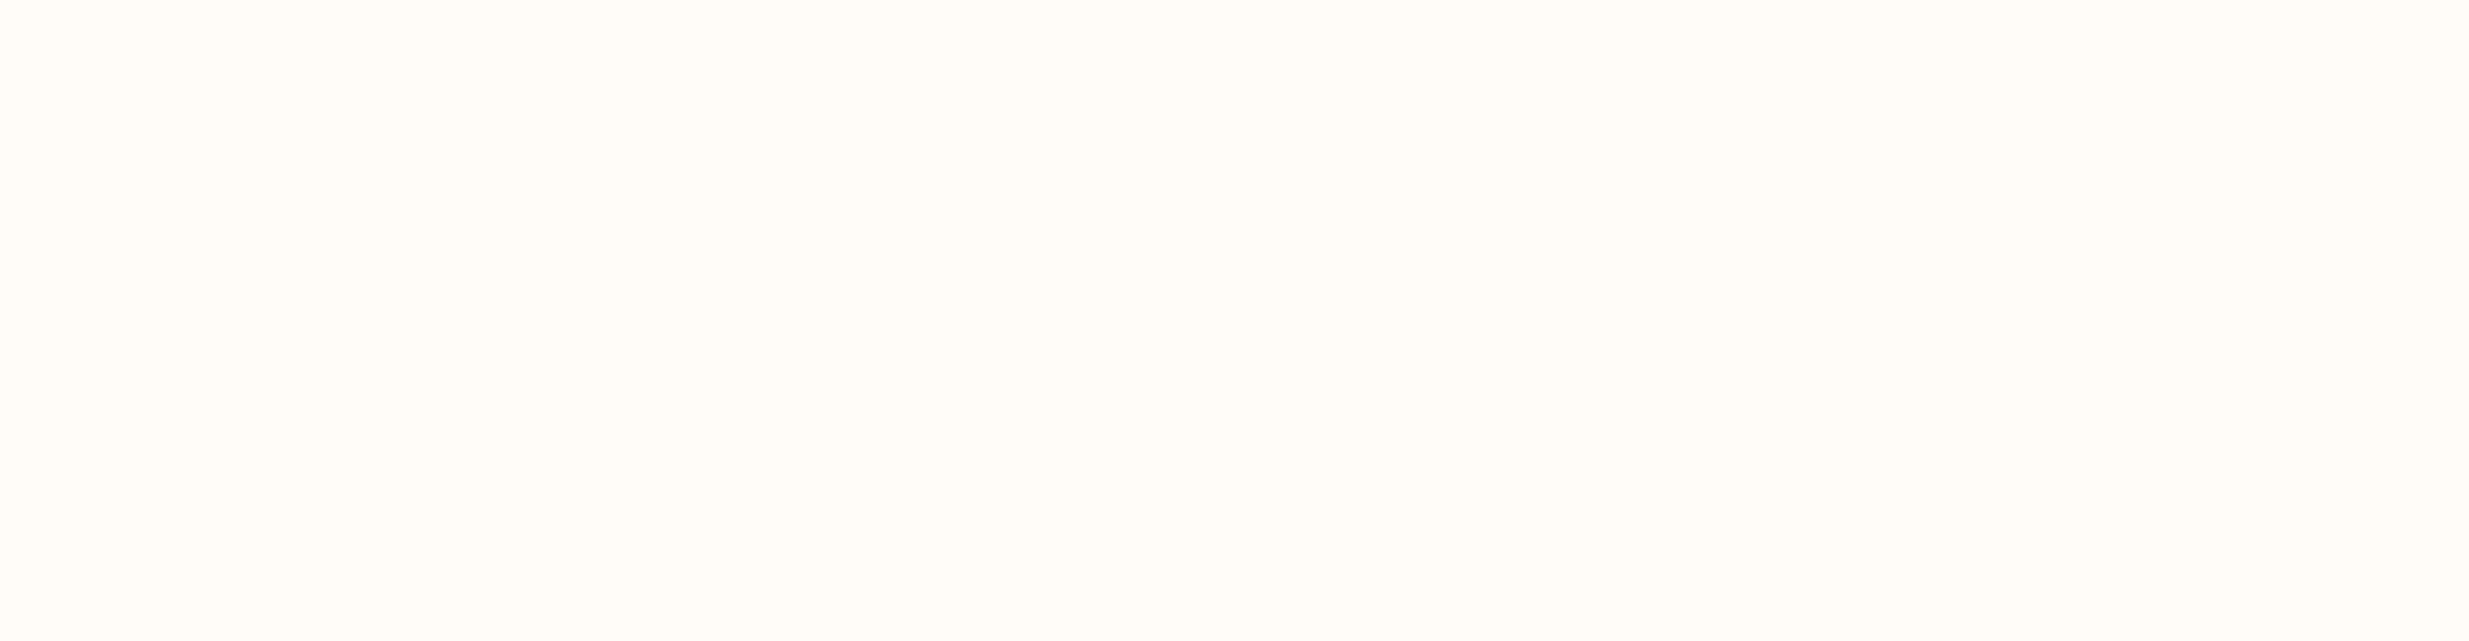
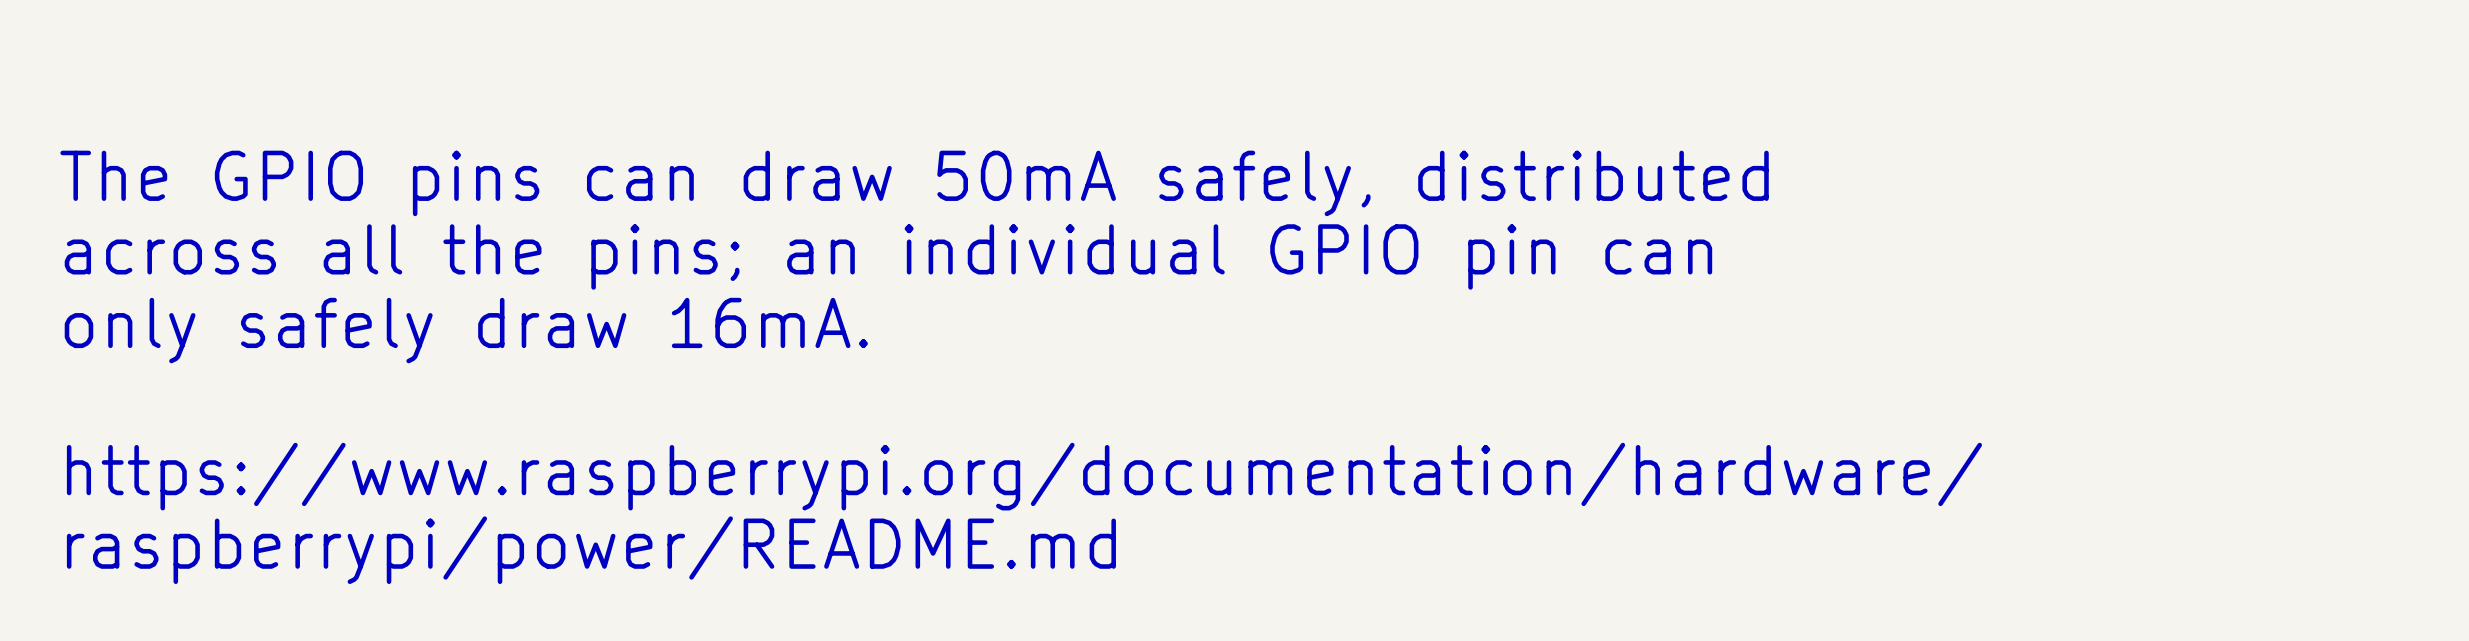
text: none -> The GPIO pins can draw 50mA safely, distributed (914, 183)
text: none -> across all the pins; an individual GPIO pin can (888, 256)
text: none -> only safely draw 16mA. (466, 330)
text: none -> https://www.raspberrypi.org/documentation/hardware/ (1024, 476)
text: none -> raspberrypi/power/README.md (591, 550)

